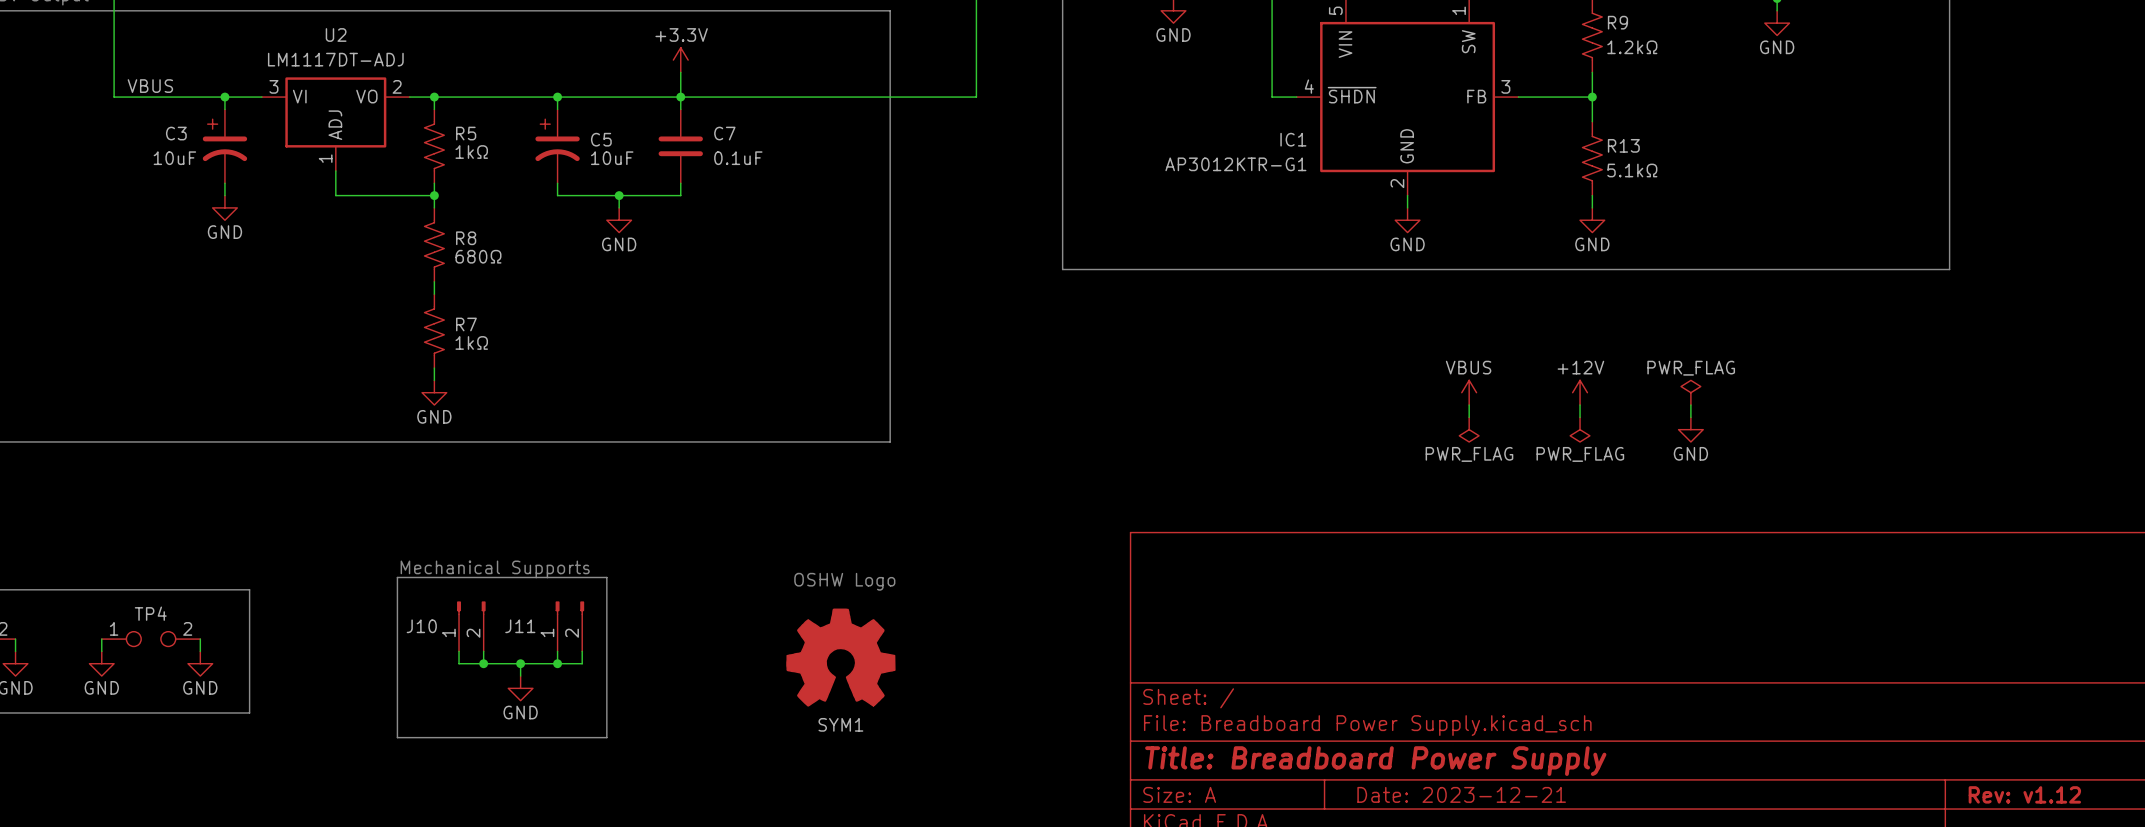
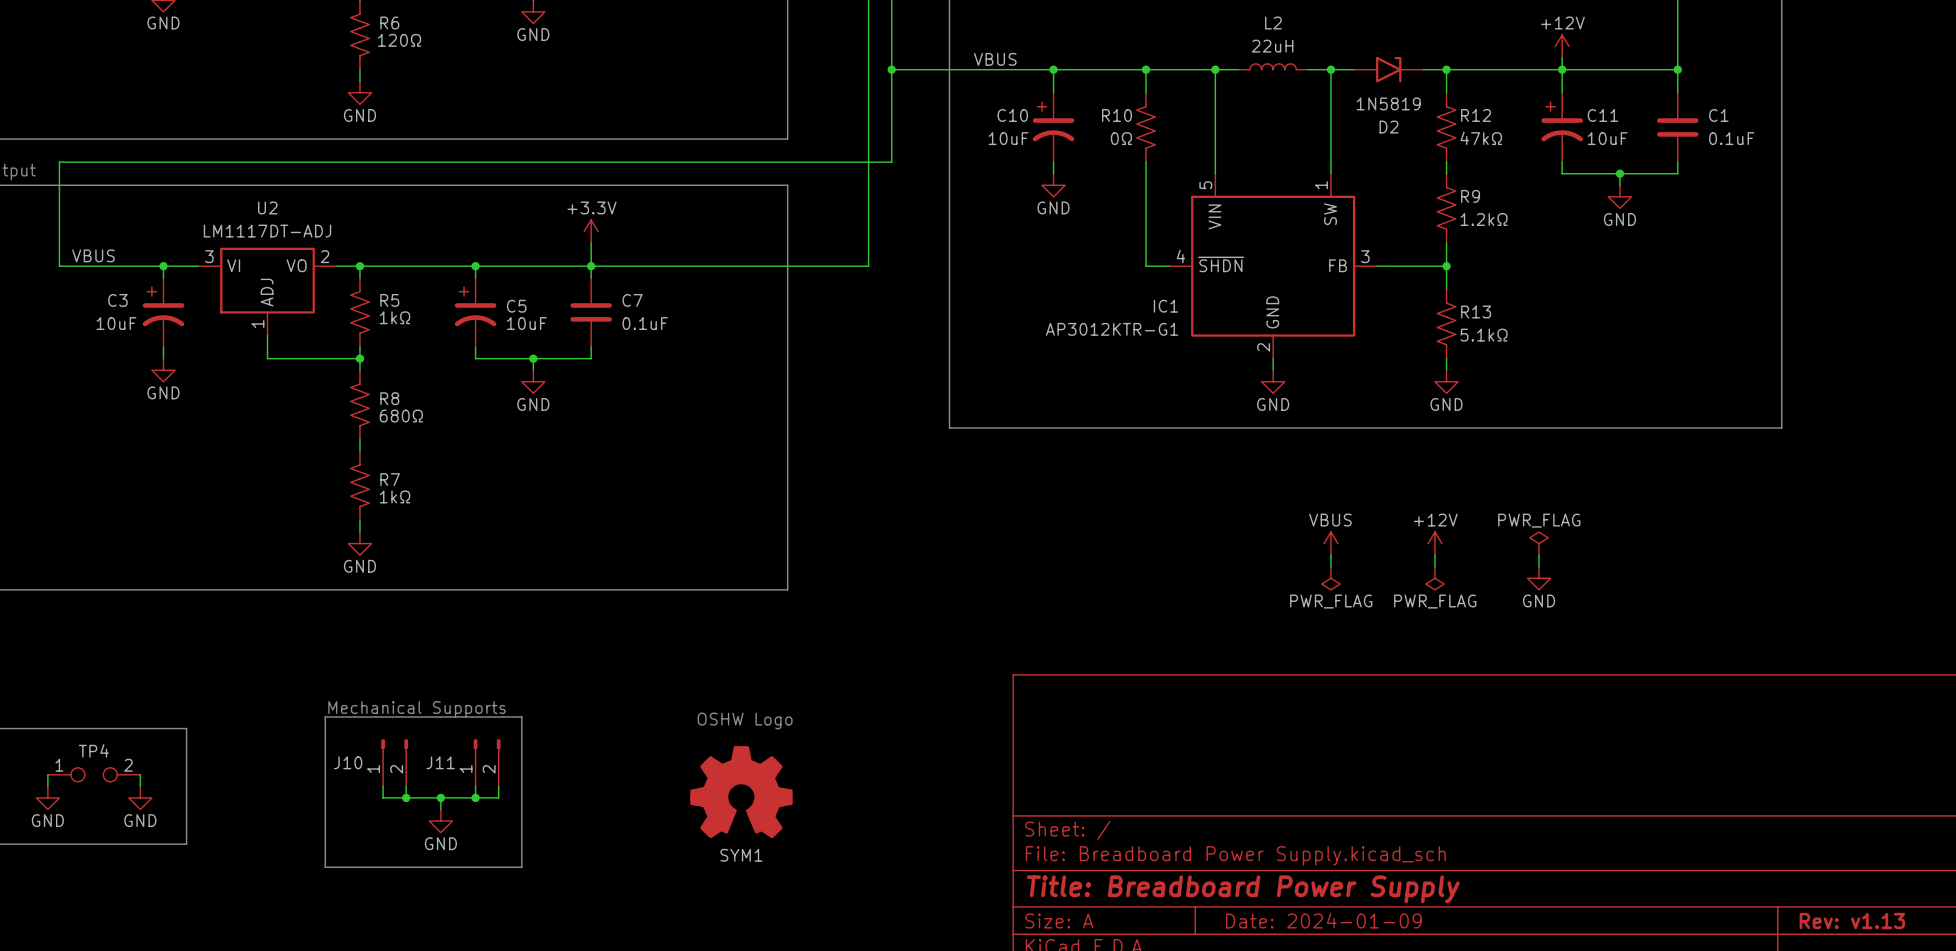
title block: Date: 2023-12-21 (1461, 794) -> Date: 2024-01-09 (1323, 920)
title block: Rev: v1.12 (2024, 794) -> Rev: v1.13 (1852, 921)

